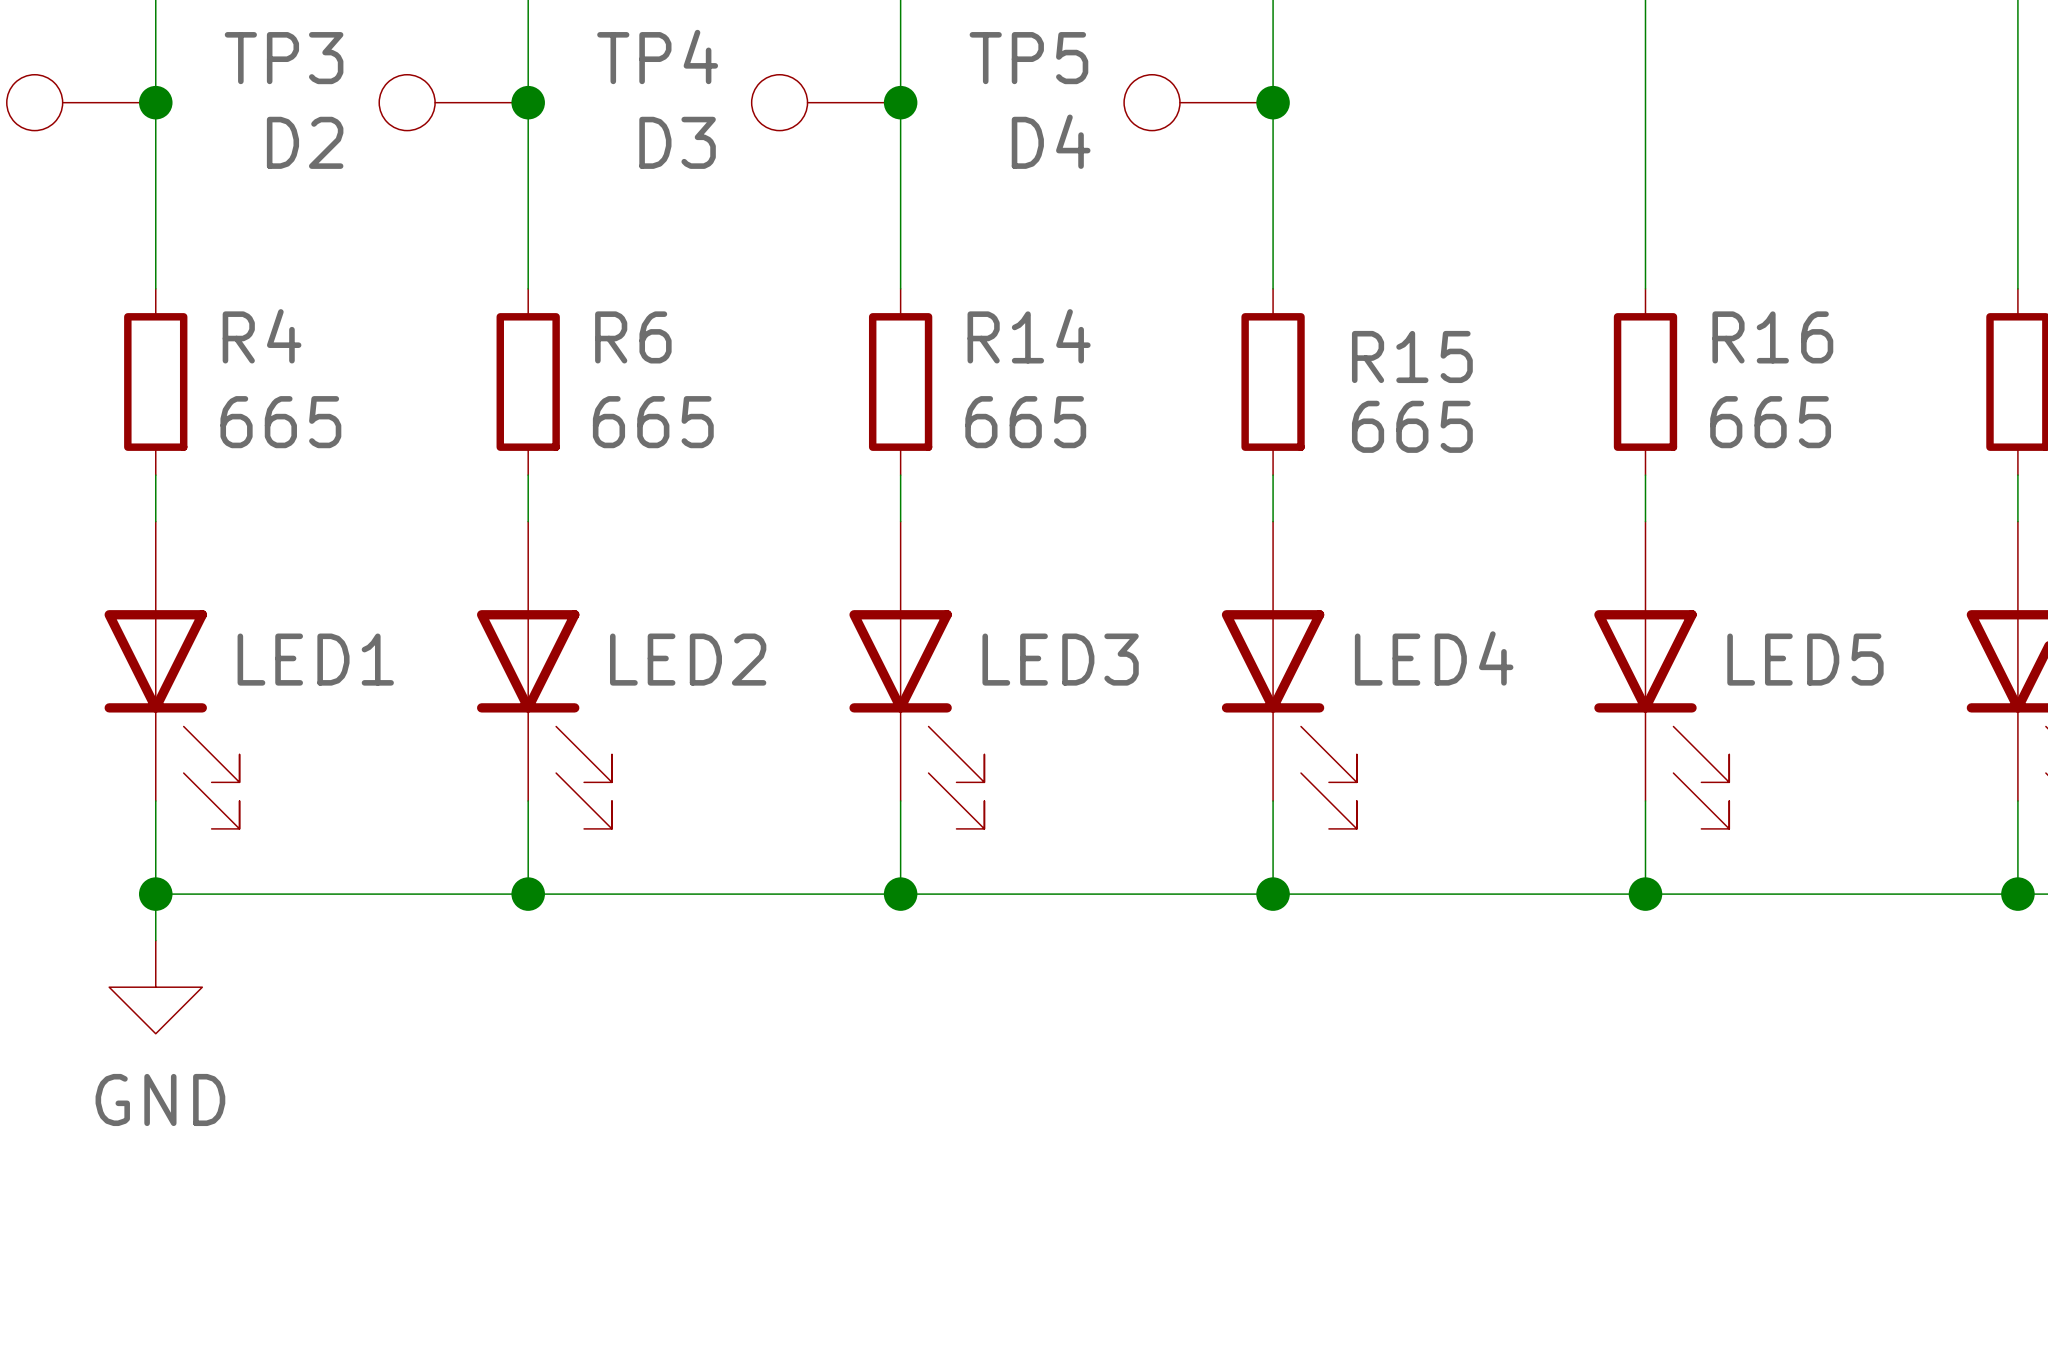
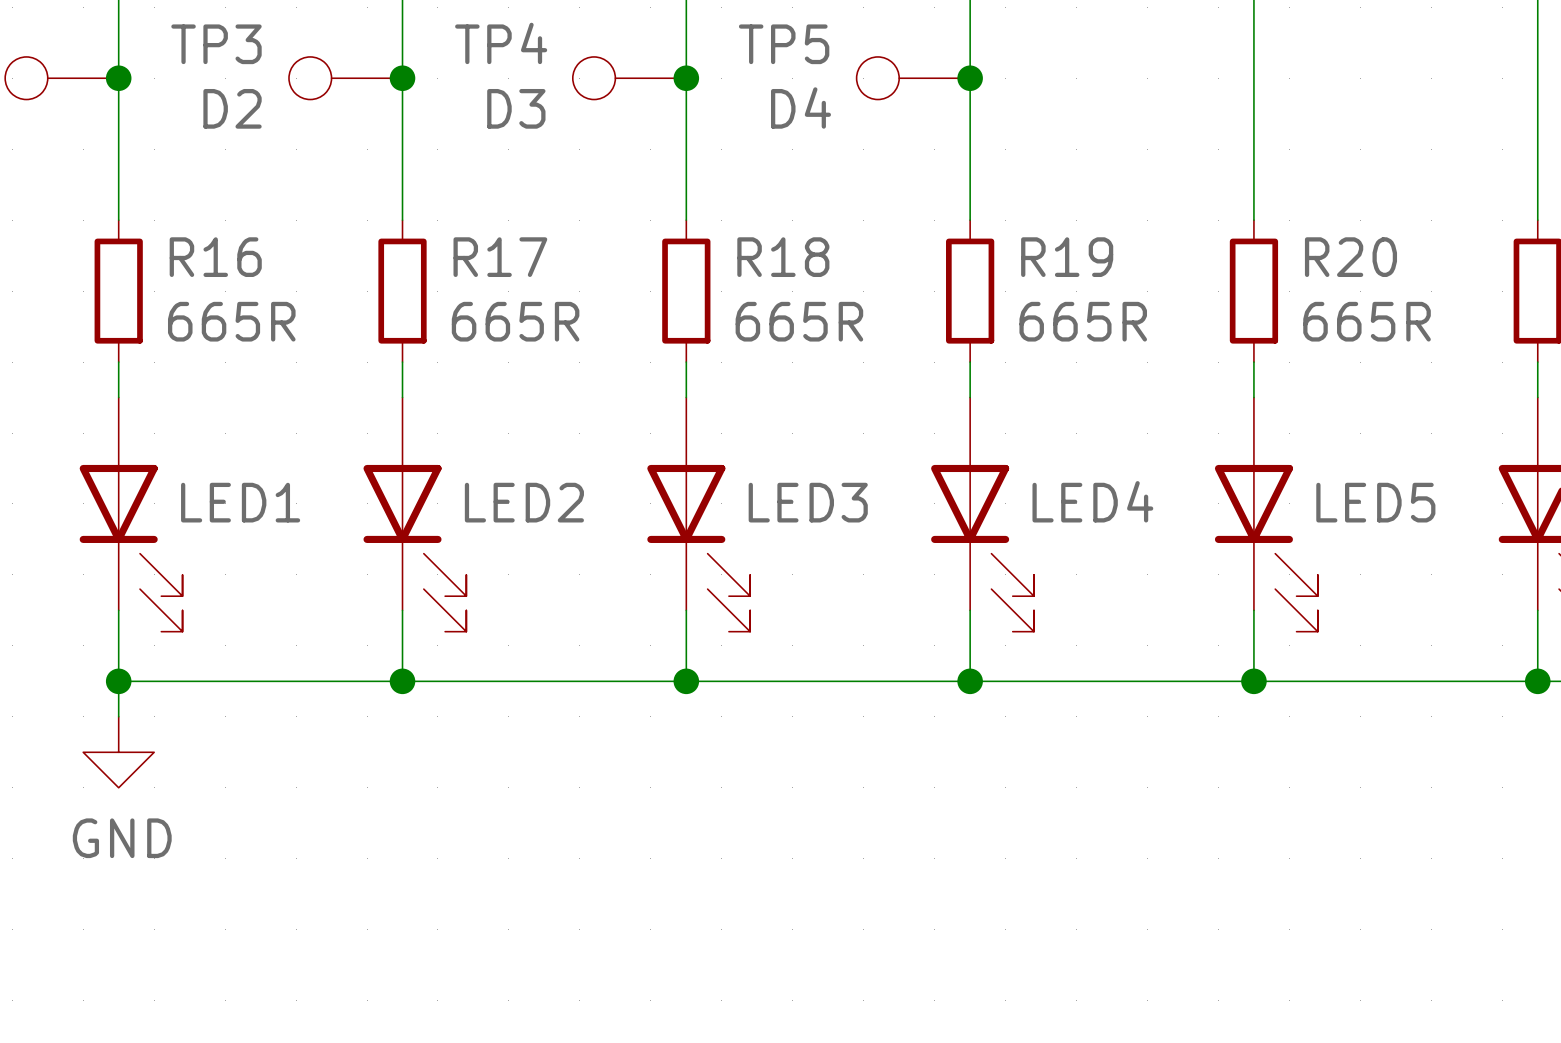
R4 name: R4 (262, 336) -> R16 (215, 257)
R14 name: R14 (1029, 336) -> R18 (783, 257)
R6 name: R6 (633, 337) -> R17 (500, 257)
R16 name: R16 (1772, 337) -> R20 (1350, 257)
R15 name: R15 (1412, 356) -> R19 (1067, 257)
R4 value: 665 (280, 422) -> 665R (231, 321)
R6 value: 665 (653, 422) -> 665R (515, 321)
R14 value: 665 (1025, 422) -> 665R (799, 321)
R16 value: 665 (1770, 422) -> 665R (1367, 321)
R15 value: 665 (1412, 426) -> 665R (1083, 321)

